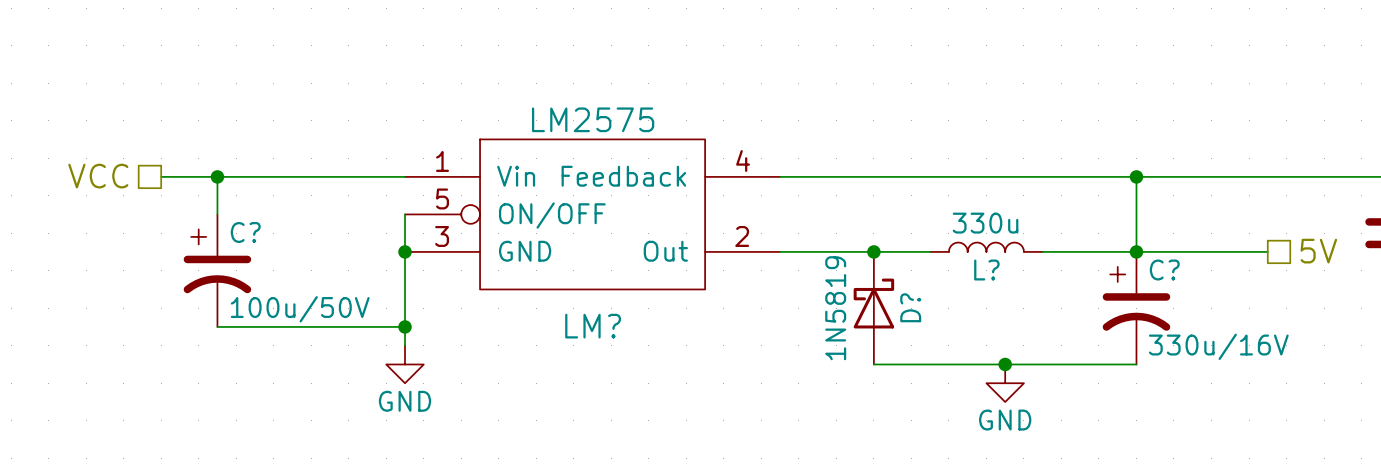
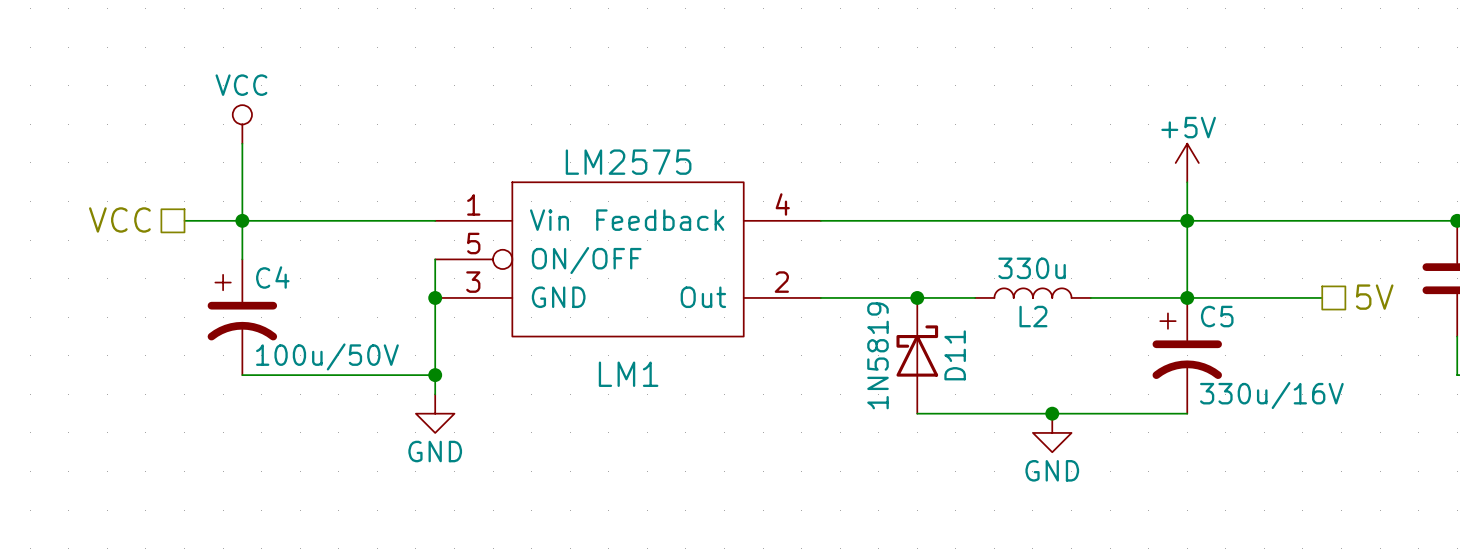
power symbol: none -> VCC (242, 124)
wire: none -> (242, 143) (242, 220)
power symbol: none -> +5V (1187, 162)
wire: none -> (1187, 182) (1187, 220)
C? name: C? (245, 232) -> C4 (272, 277)
L? name: L? (986, 270) -> L2 (1033, 316)
C? name: C? (1164, 270) -> C5 (1217, 316)
D? name: D? (910, 307) -> D11 (955, 355)
LM? name: LM? (593, 326) -> LM1 (628, 374)

